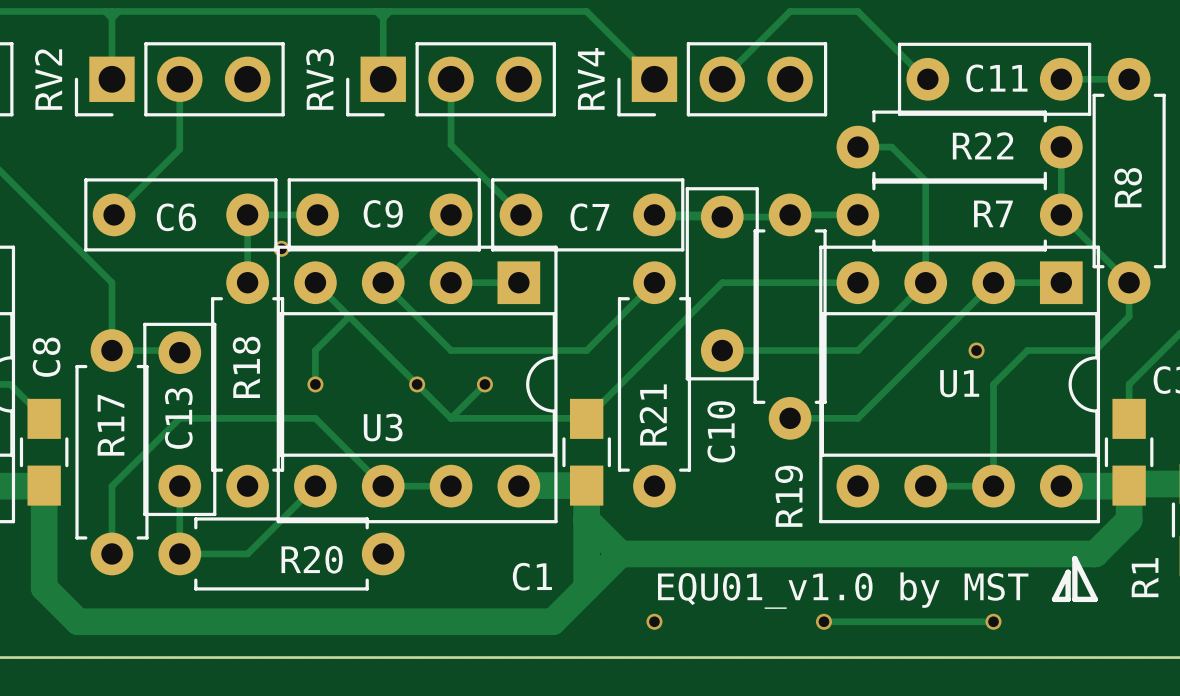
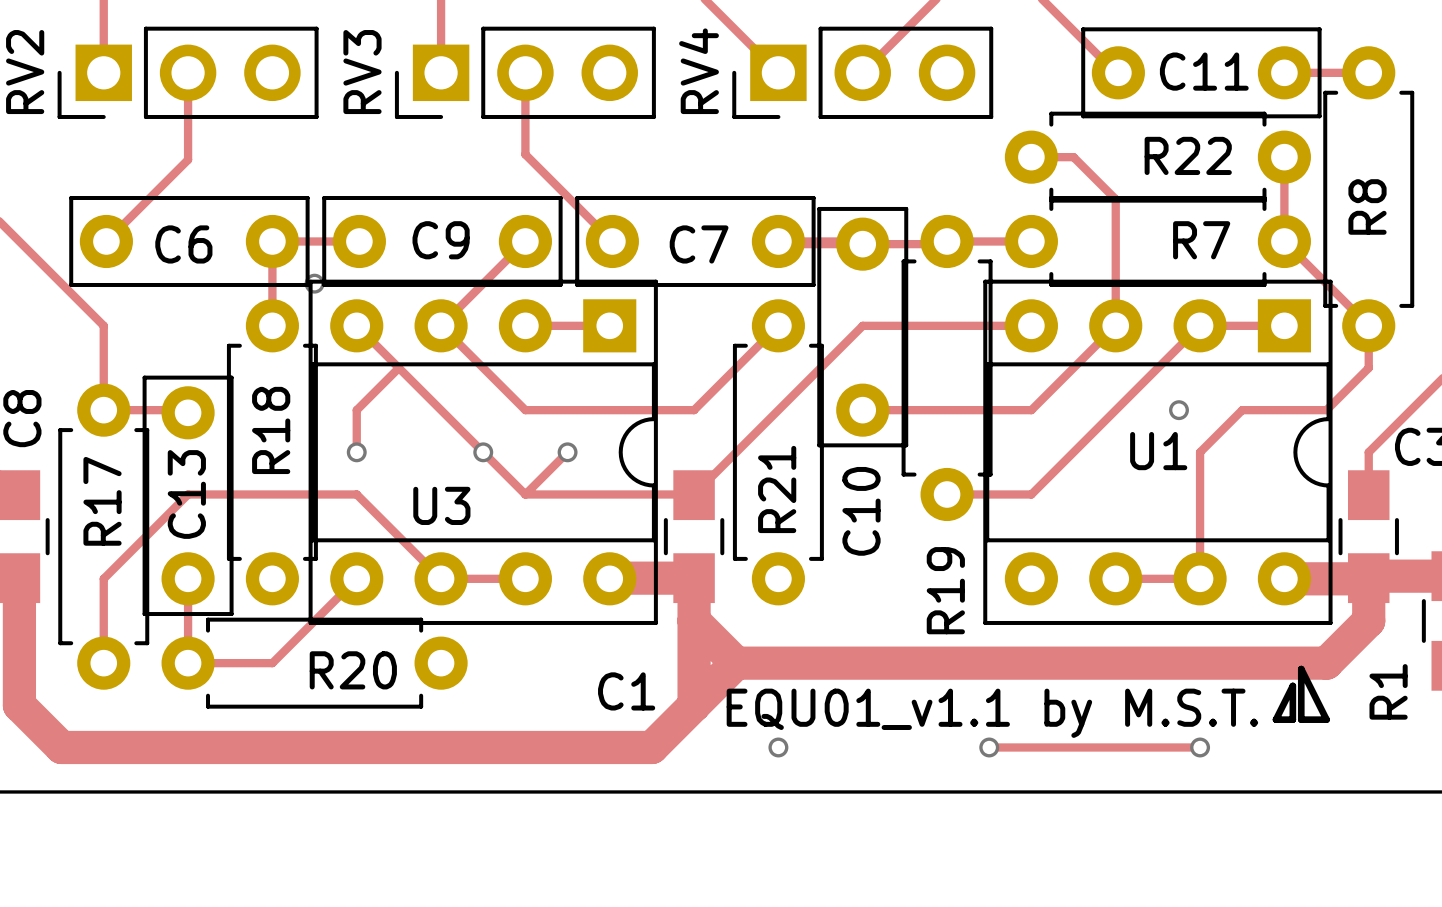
text: EQU01_v1.0 by MST (843, 590) -> EQU01_v1.1 by M.S.T. (992, 713)

